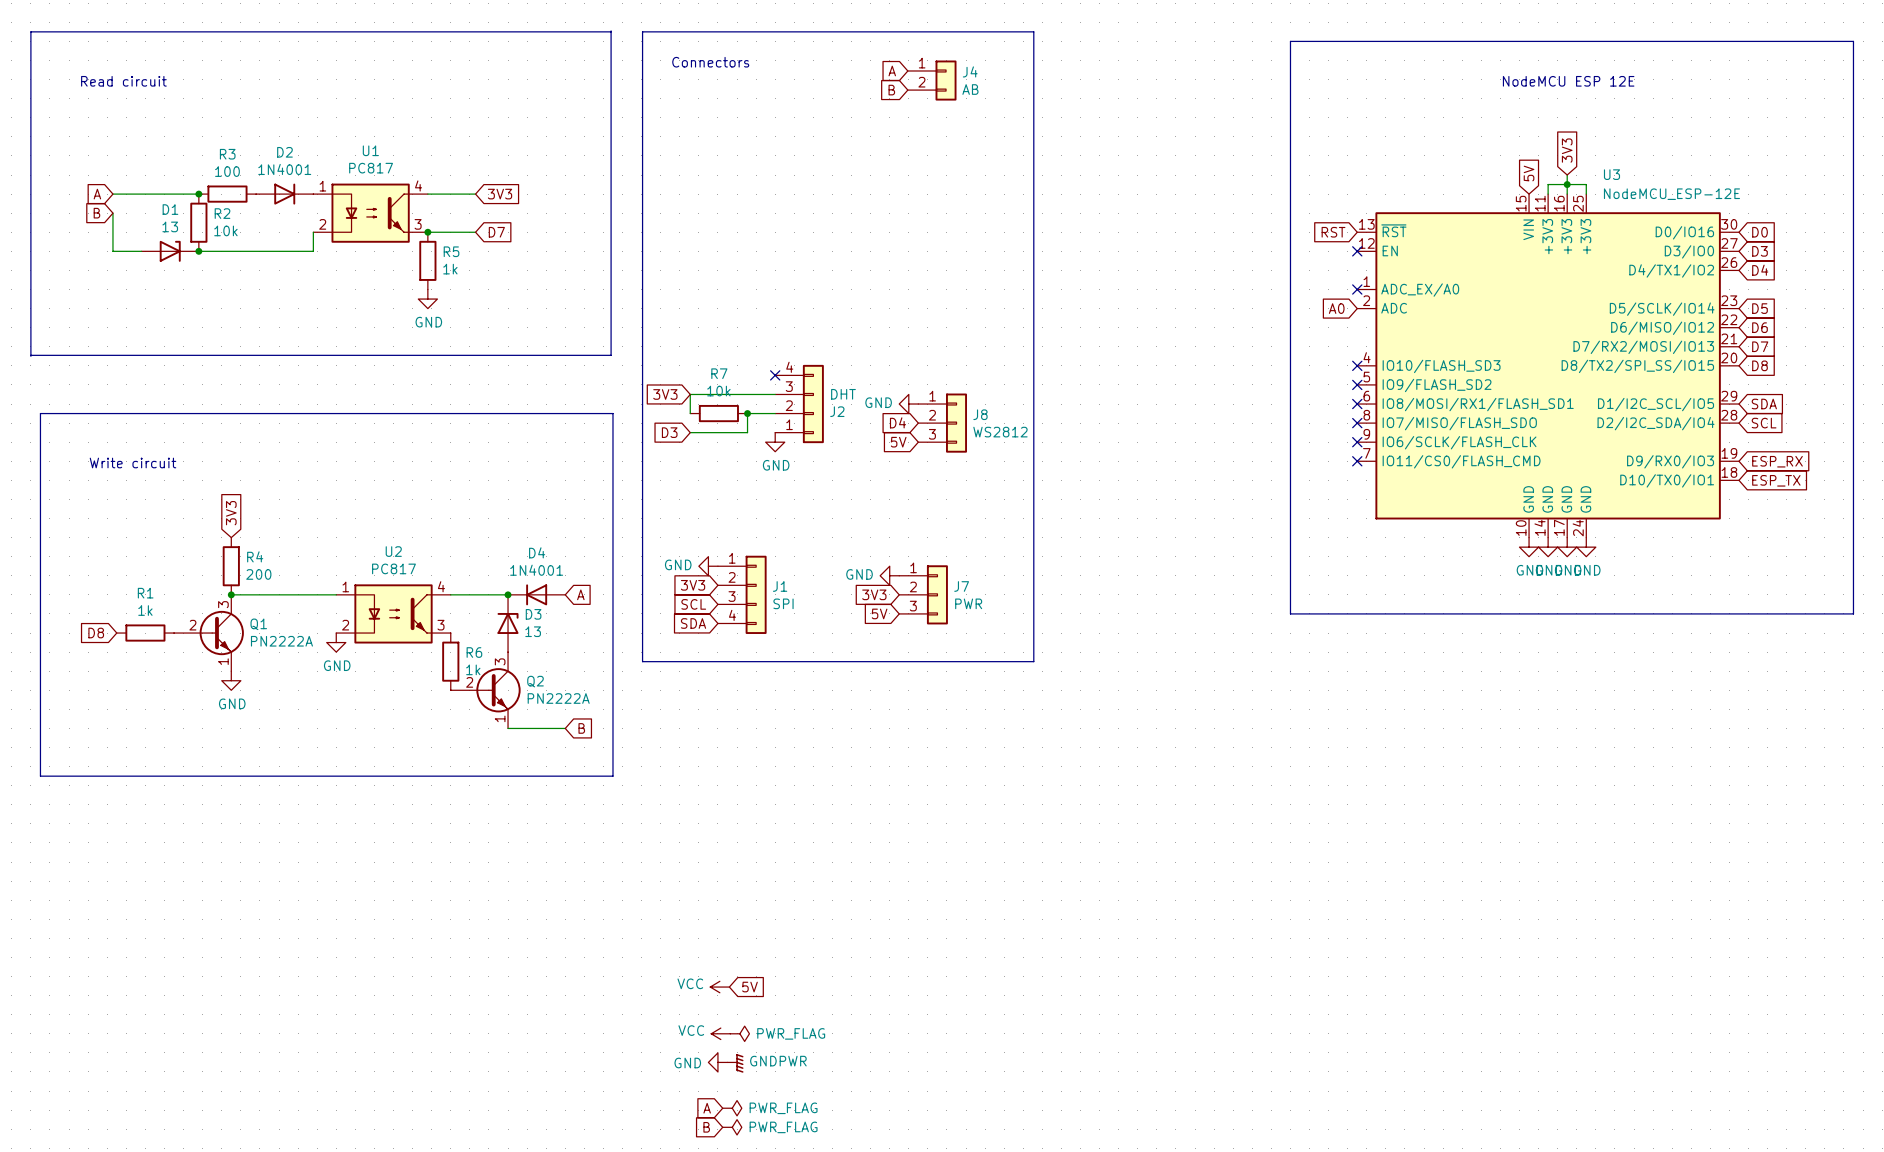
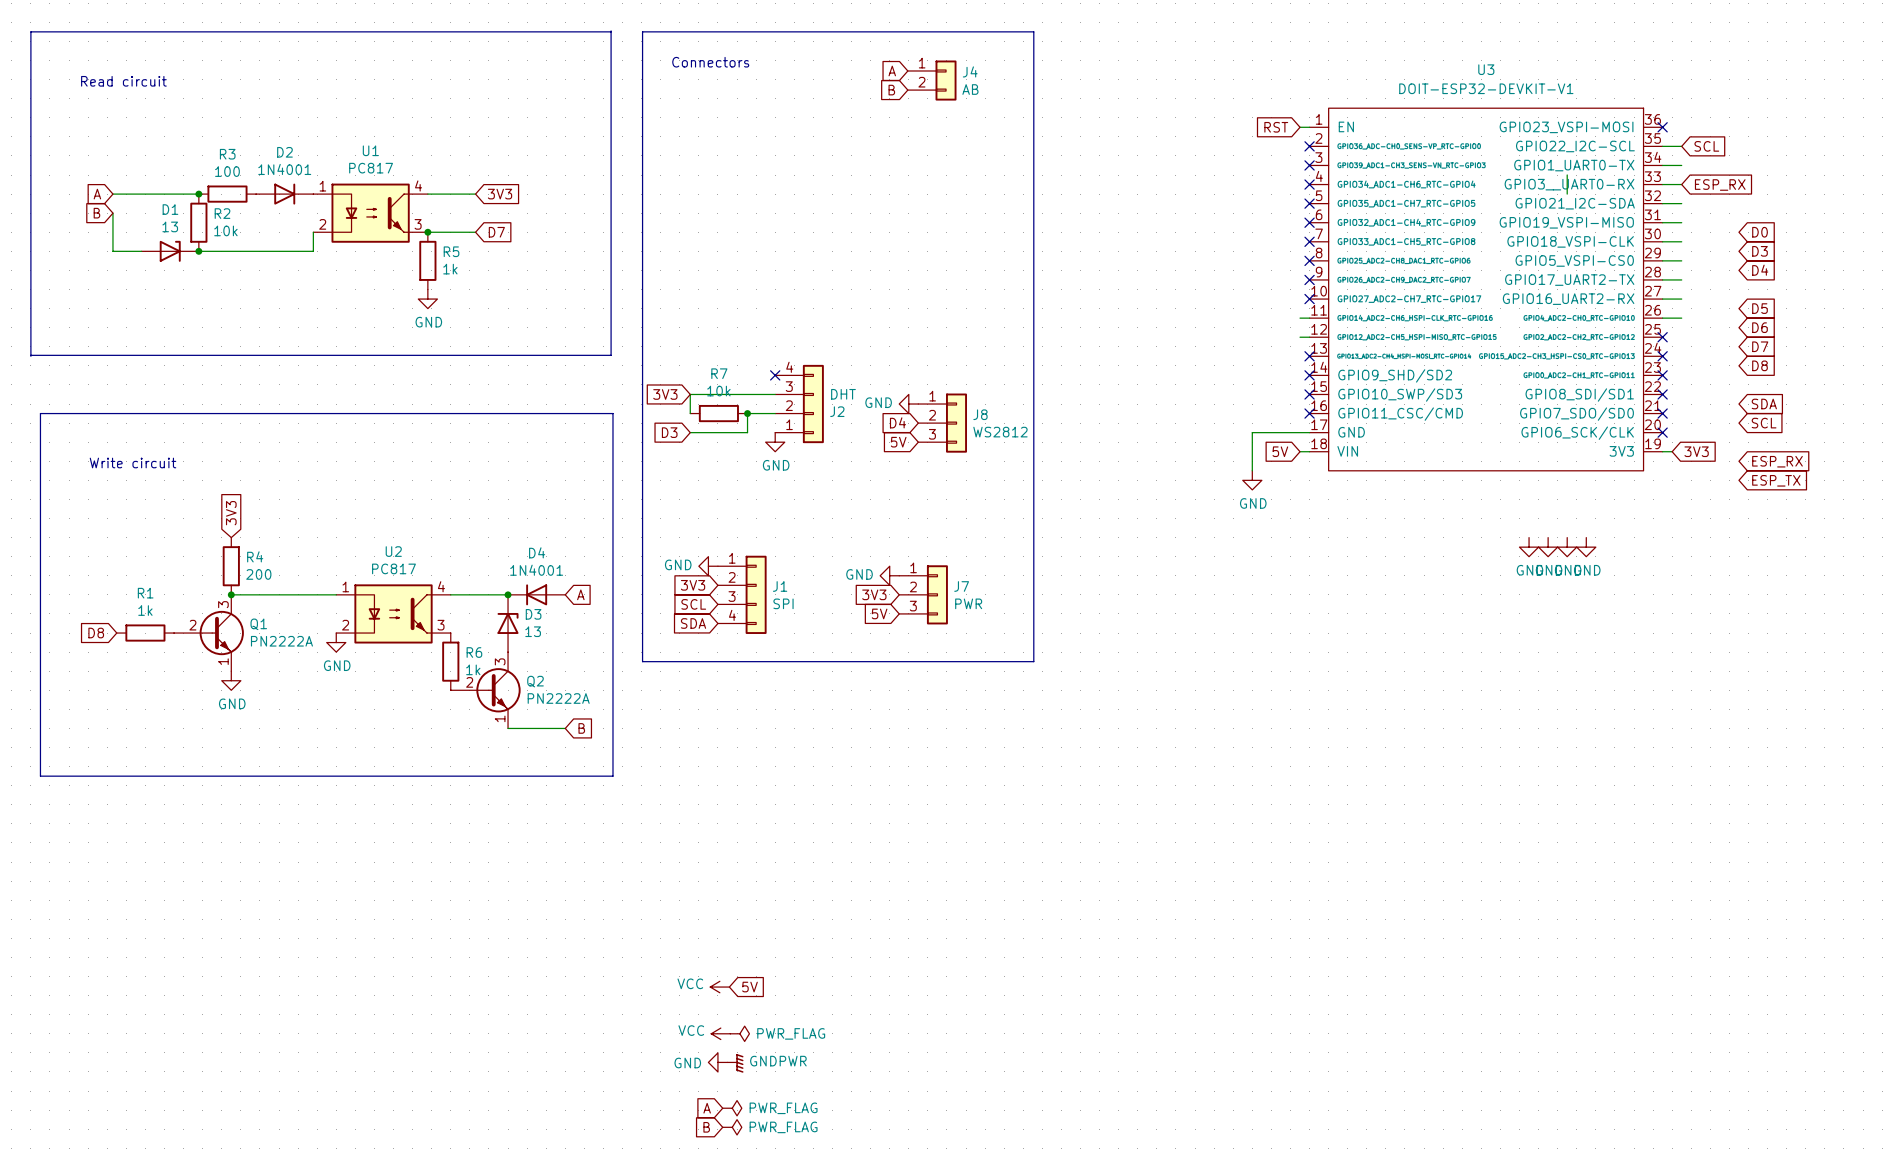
line: (1290, 41) (1853, 41) (1853, 613) (1290, 613) (1290, 41) -> none
text: NodeMCU ESP 12E (1568, 81) -> none
wire: none -> (1300, 127) (1309, 127)
no-connect mark: none -> (1662, 127)
no-connect mark: none -> (1309, 146)
wire: none -> (1662, 146) (1681, 146)
global label: none -> SCL (1706, 146)
global label: 3V3 (1567, 150) -> none
no-connect mark: none -> (1309, 165)
wire: none -> (1662, 165) (1681, 165)
global label: 5V (1529, 173) -> none
U3 name position: U3 (1611, 174) -> U3 (1486, 69)
no-connect mark: none -> (1309, 184)
junction: (1567, 184) -> none
wire: none -> (1662, 184) (1681, 184)
global label: none -> ESP_RX (1720, 184)
U3 symbol: [1357, 194, 1739, 538] -> [1309, 108, 1663, 471]
wire: (1548, 194) (1548, 184) (1586, 184) (1586, 194) -> none
U3 value: NodeMCU_ESP-12E (1671, 194) -> DOIT-ESP32-DEVKIT-V1 (1486, 88)
no-connect mark: none -> (1309, 203)
wire: none -> (1662, 203) (1681, 203)
no-connect mark: none -> (1309, 222)
global label position: RST (1333, 232) -> RST (1276, 127)
no-connect mark: none -> (1309, 241)
no-connect mark: (1357, 251) -> none
no-connect mark: none -> (1309, 260)
no-connect mark: none -> (1309, 279)
no-connect mark: (1357, 289) -> none
no-connect mark: none -> (1309, 299)
global label: A0 (1336, 308) -> none
wire: none -> (1300, 318) (1309, 318)
wire: none -> (1300, 337) (1309, 337)
no-connect mark: none -> (1662, 337)
no-connect mark: none -> (1309, 356)
no-connect mark: none -> (1662, 356)
no-connect mark: (1357, 365) -> none
no-connect mark: none -> (1309, 375)
no-connect mark: none -> (1662, 375)
no-connect mark: (1357, 384) -> none
no-connect mark: none -> (1309, 394)
no-connect mark: none -> (1662, 394)
no-connect mark: (1357, 404) -> none
no-connect mark: none -> (1309, 413)
no-connect mark: none -> (1662, 413)
no-connect mark: (1357, 423) -> none
wire: none -> (1309, 432) (1252, 432) (1252, 470)
no-connect mark: none -> (1662, 432)
no-connect mark: (1357, 442) -> none
global label: none -> 5V (1280, 451)
wire: none -> (1300, 451) (1309, 451)
global label: none -> 3V3 (1696, 451)
no-connect mark: (1357, 461) -> none
power symbol: none -> GND (1252, 480)

